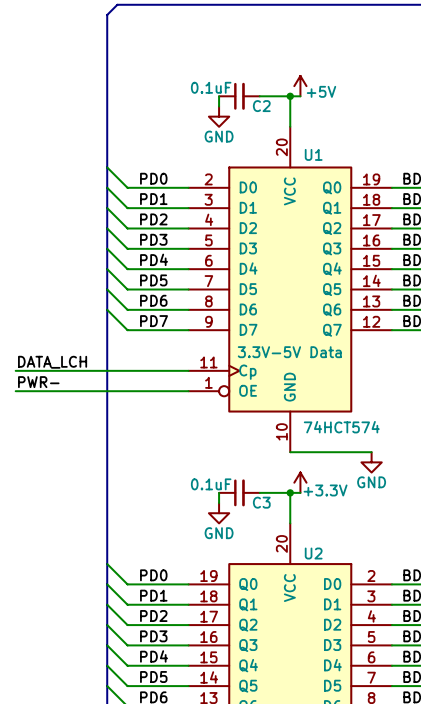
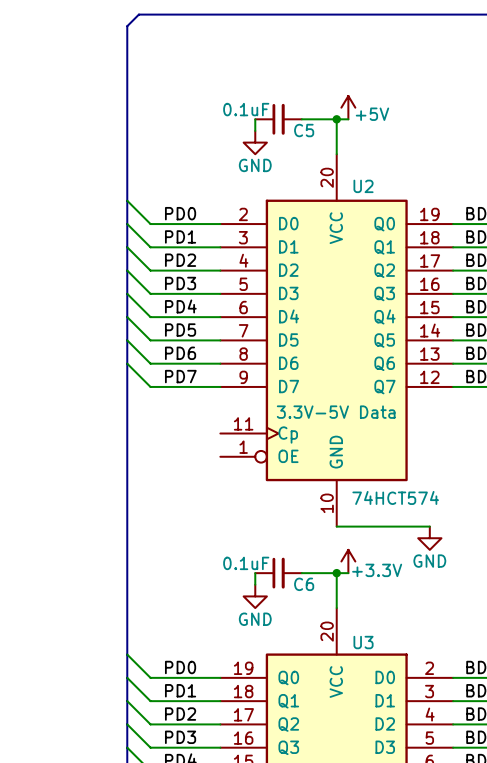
C2 name: C2 (261, 106) -> C5 (304, 130)
U1 name: U1 (313, 154) -> U2 (363, 186)
label: DATA_LCH (52, 362) -> none
wire: (15, 370) (188, 370) -> none
label: PWR- (38, 382) -> none
wire: (15, 391) (188, 391) -> none
C3 name: C3 (261, 502) -> C6 (304, 584)
U2 name: U2 (313, 553) -> U3 (363, 642)

